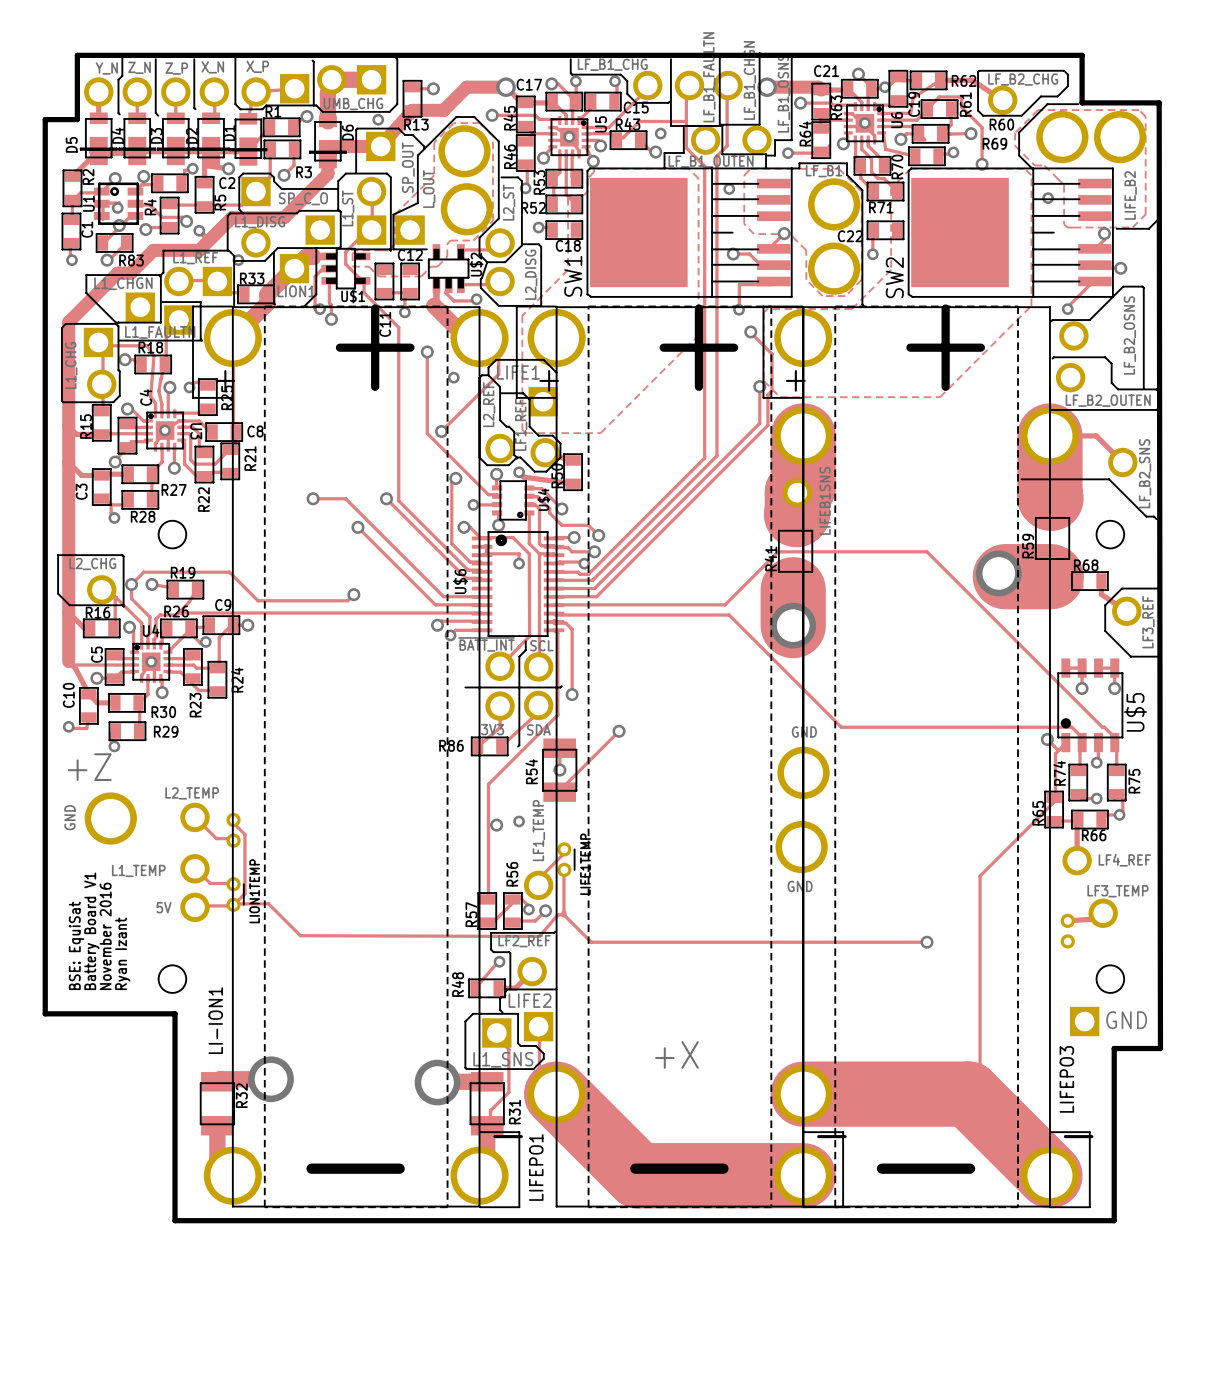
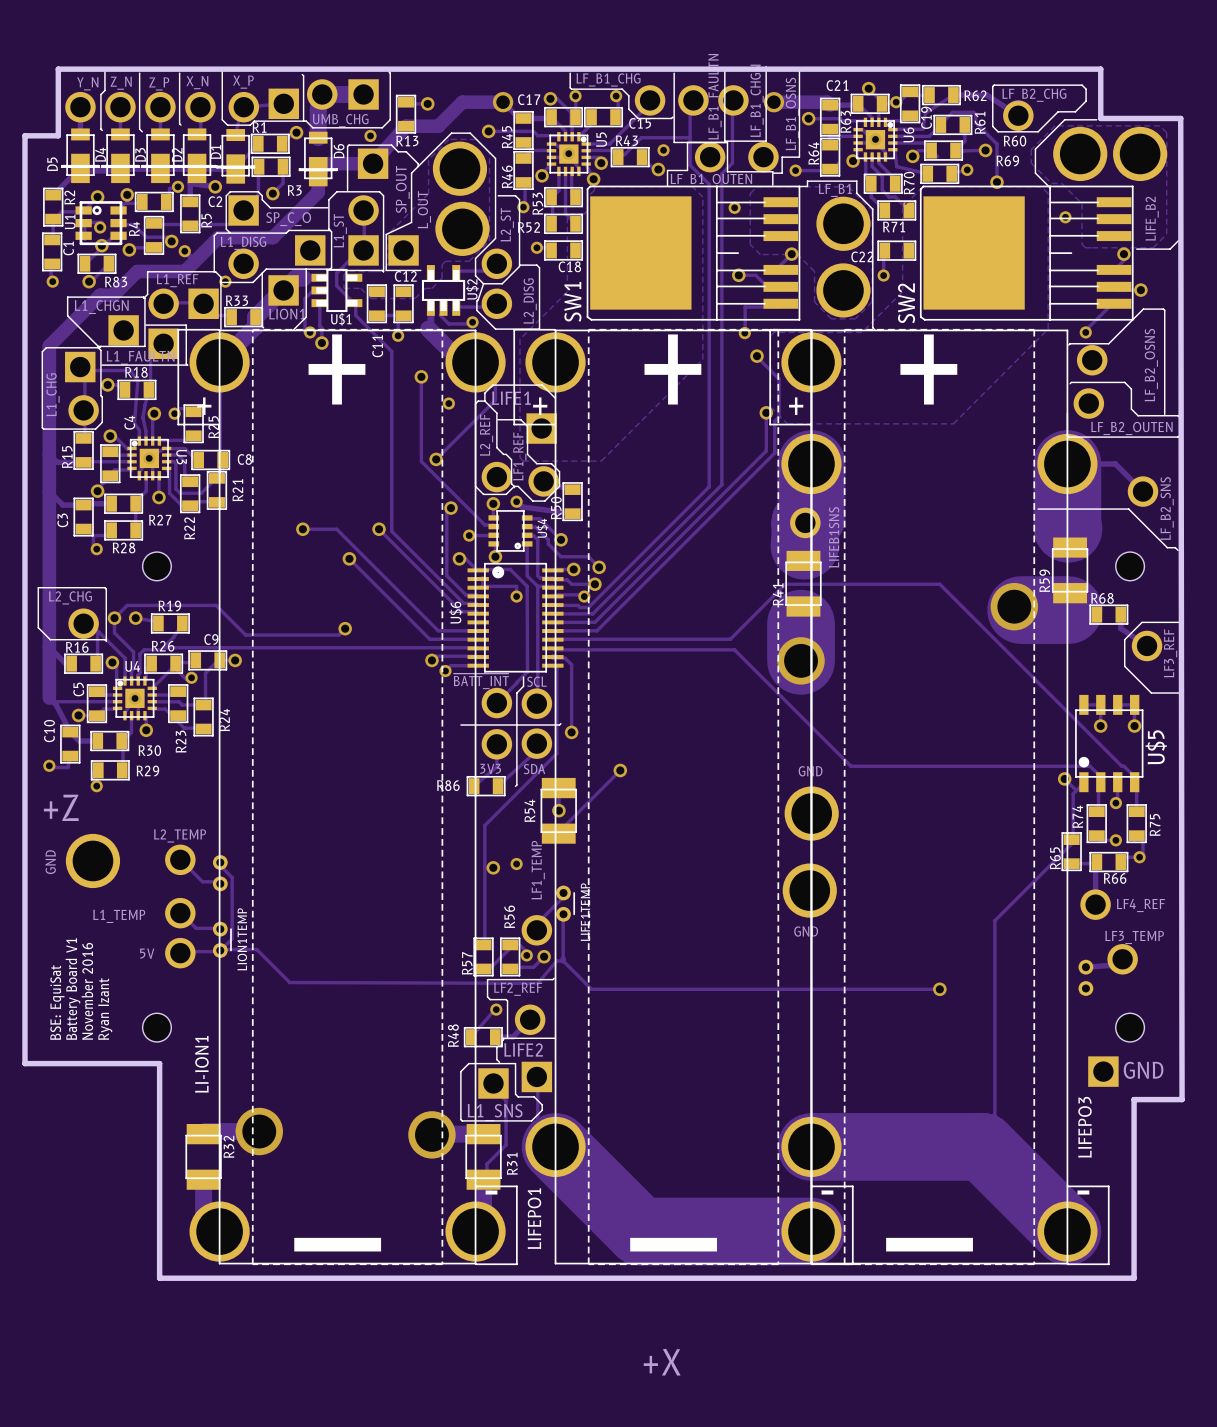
text position: +X (676, 1054) -> +X (662, 1362)

